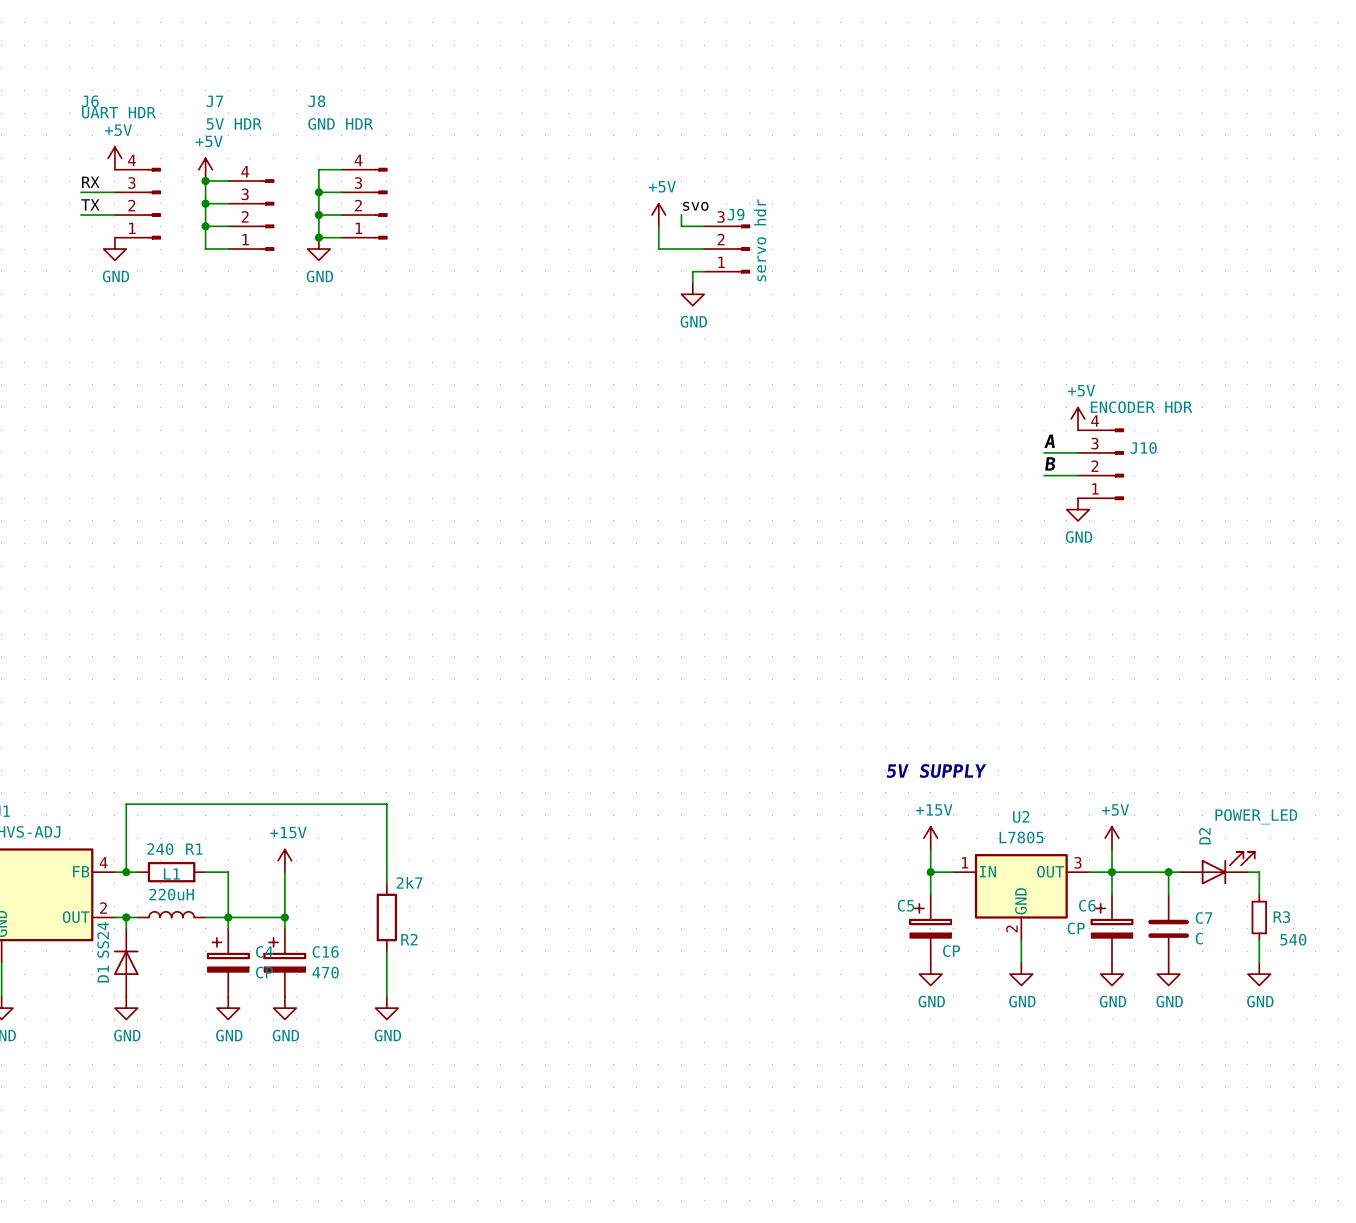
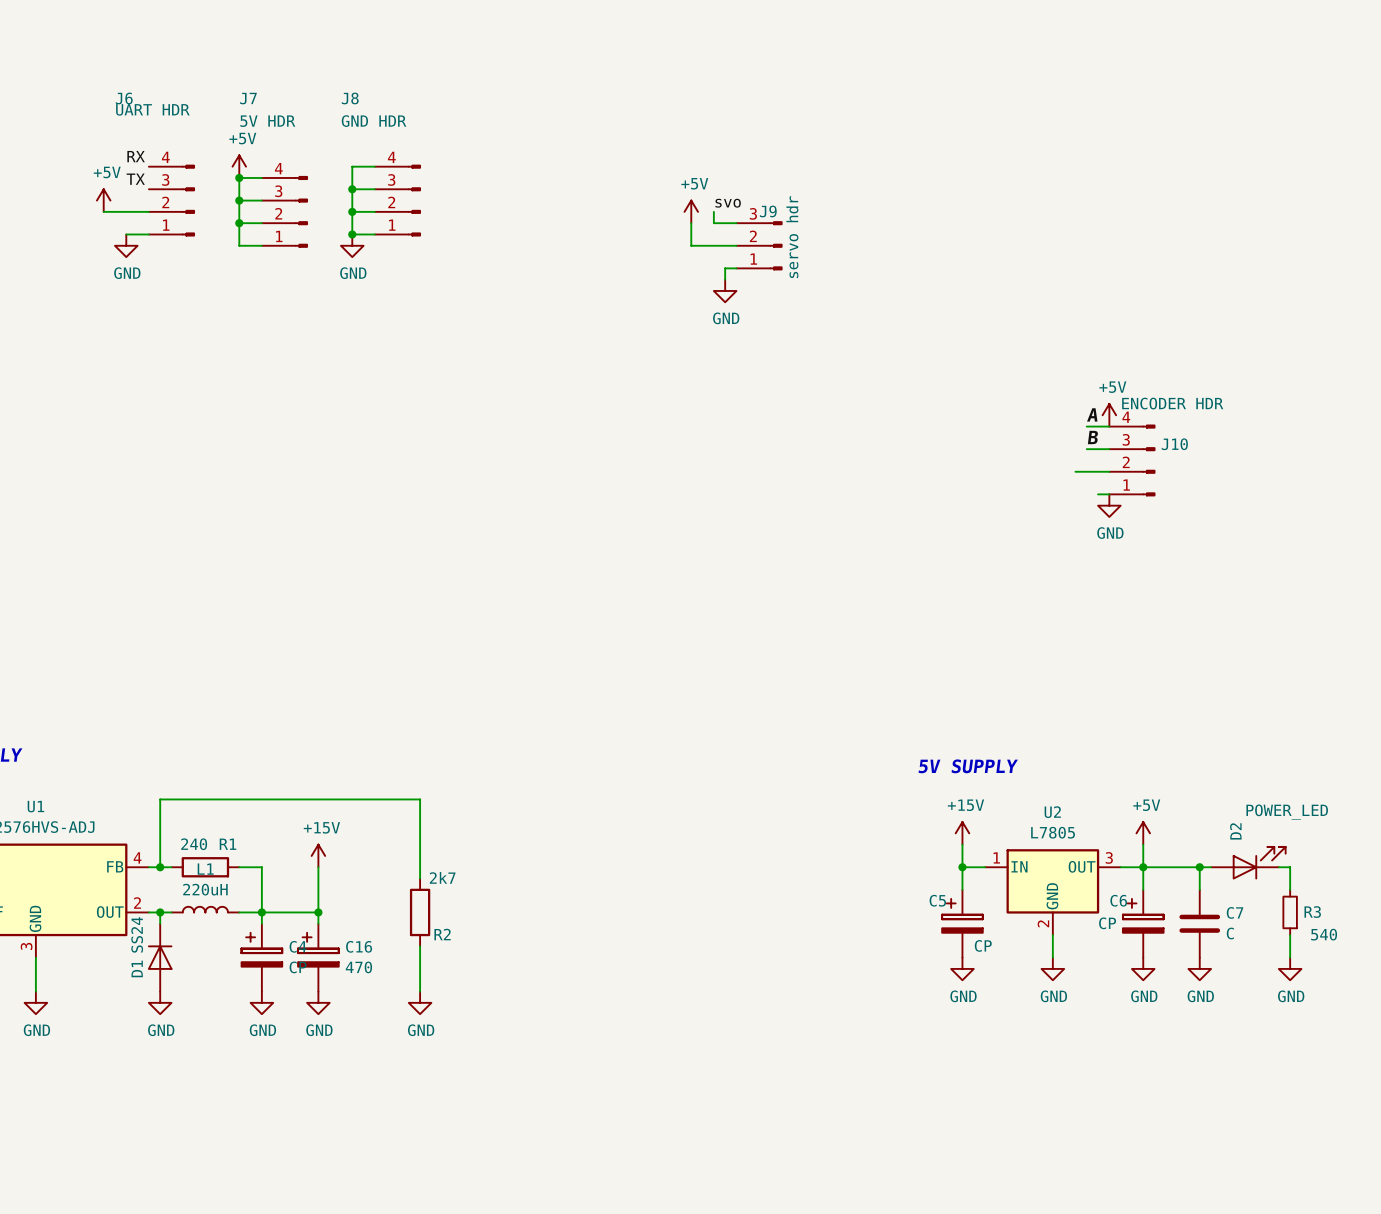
power symbol position: +5V (114, 158) -> +5V (103, 200)
label position: RX (90, 182) -> RX (136, 156)
wire: (80, 192) (114, 192) -> none
label position: TX (90, 204) -> TX (135, 179)
wire: none -> (103, 211) (115, 211)
wire: none -> (126, 234) (148, 234)
power symbol position: GND (114, 249) -> GND (126, 245)
wire: none -> (1086, 426) (1109, 426)
label position: A (1049, 441) -> A (1092, 414)
wire: (1044, 452) (1055, 452) -> (1098, 494) (1109, 494)
label position: B (1050, 463) -> B (1092, 437)

